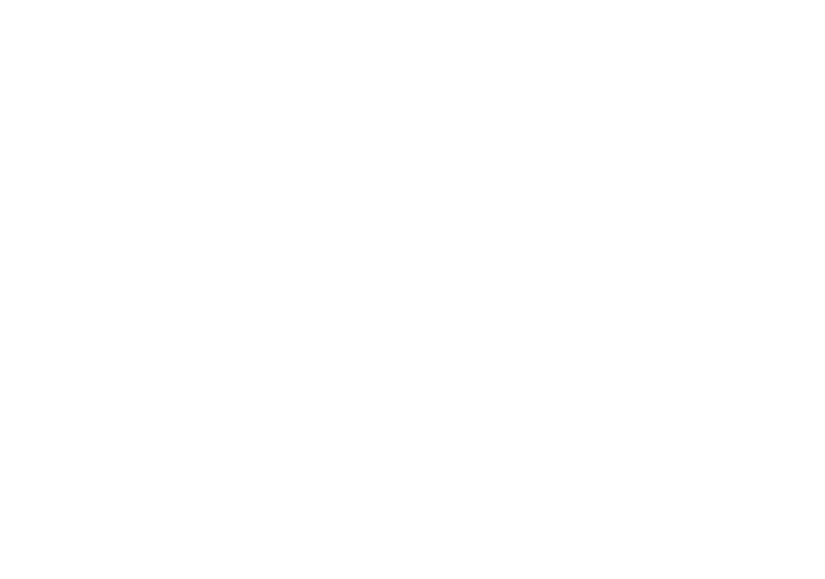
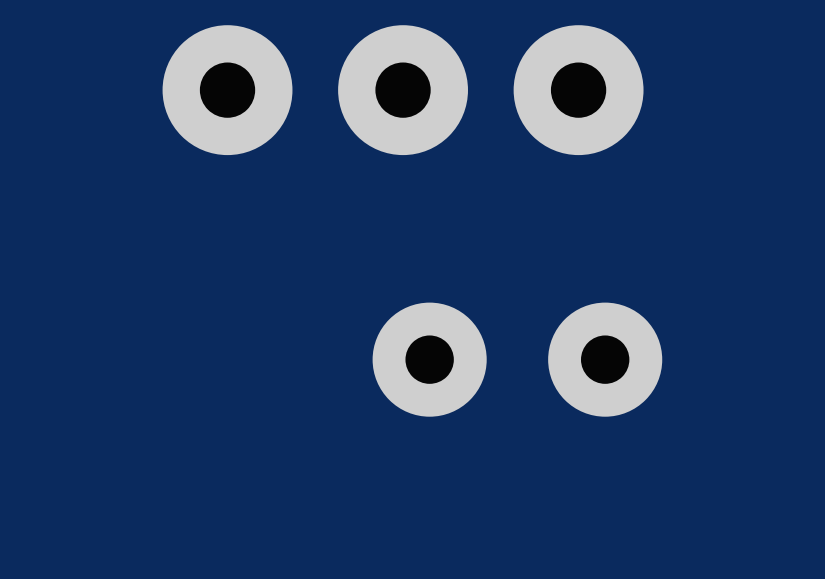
part: none -> (403, 90)
part: none -> (517, 359)

